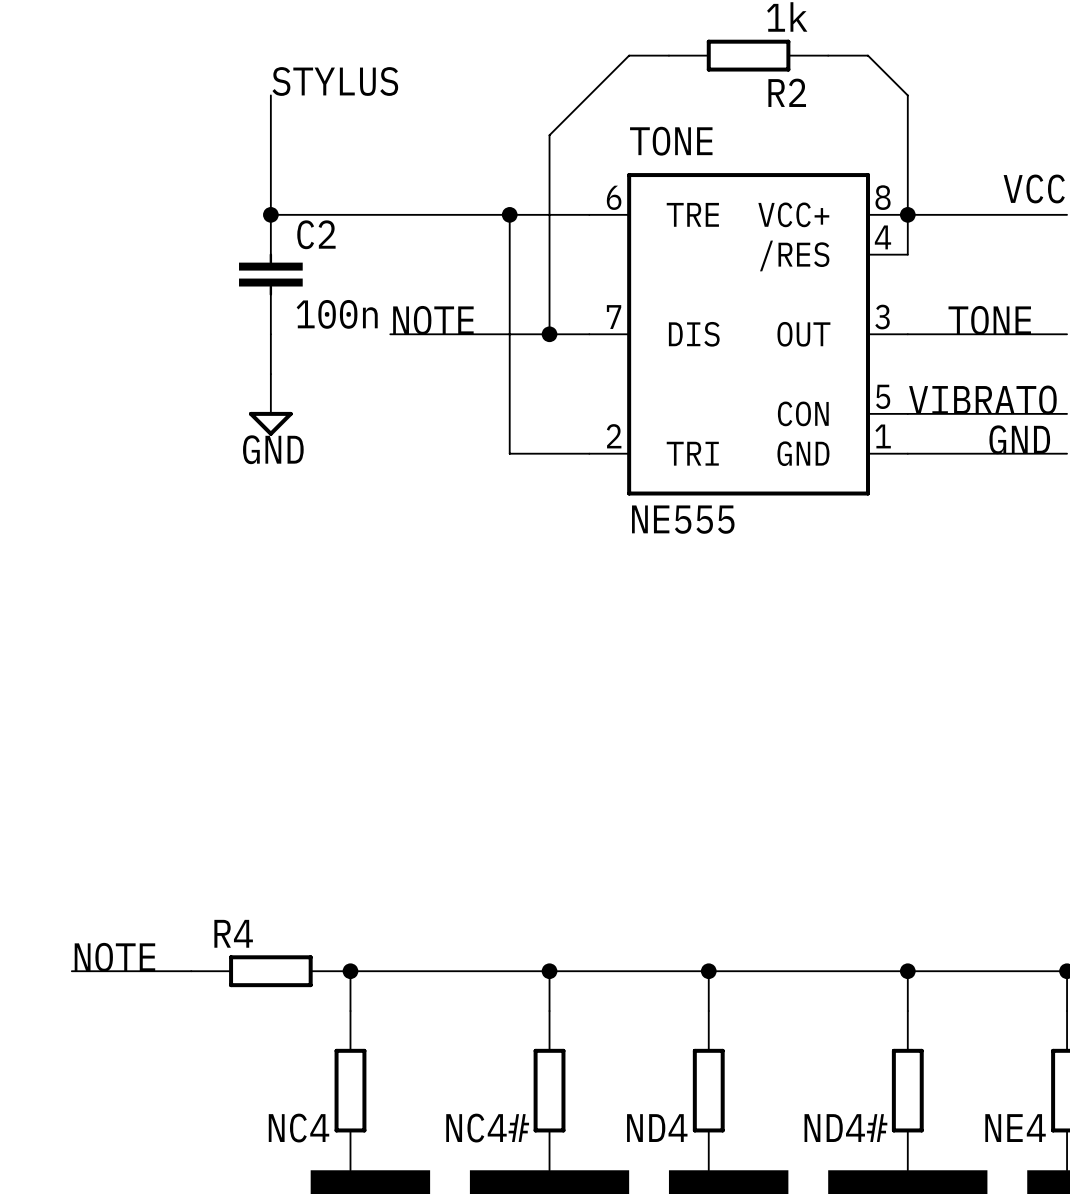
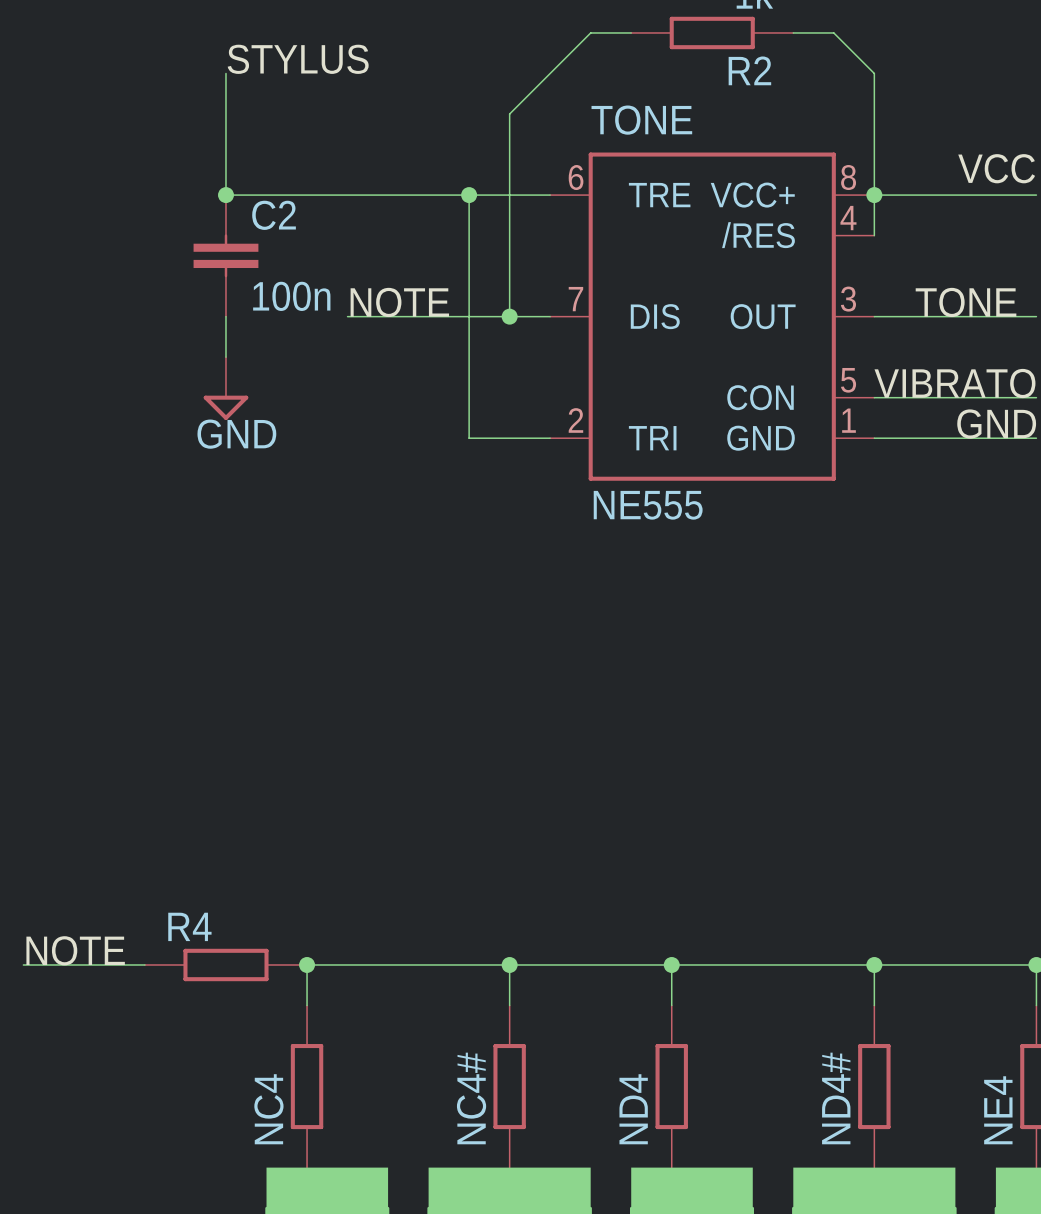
NC4 name rotation: 0° (299, 1128) -> 90° counterclockwise (268, 1109)
NC4# name rotation: 0° (487, 1128) -> 90° counterclockwise (471, 1098)
ND4 name rotation: 0° (657, 1128) -> 90° counterclockwise (633, 1109)
ND4# name rotation: 0° (845, 1128) -> 90° counterclockwise (836, 1098)
NE4 name rotation: 0° (1015, 1128) -> 90° counterclockwise (998, 1110)

